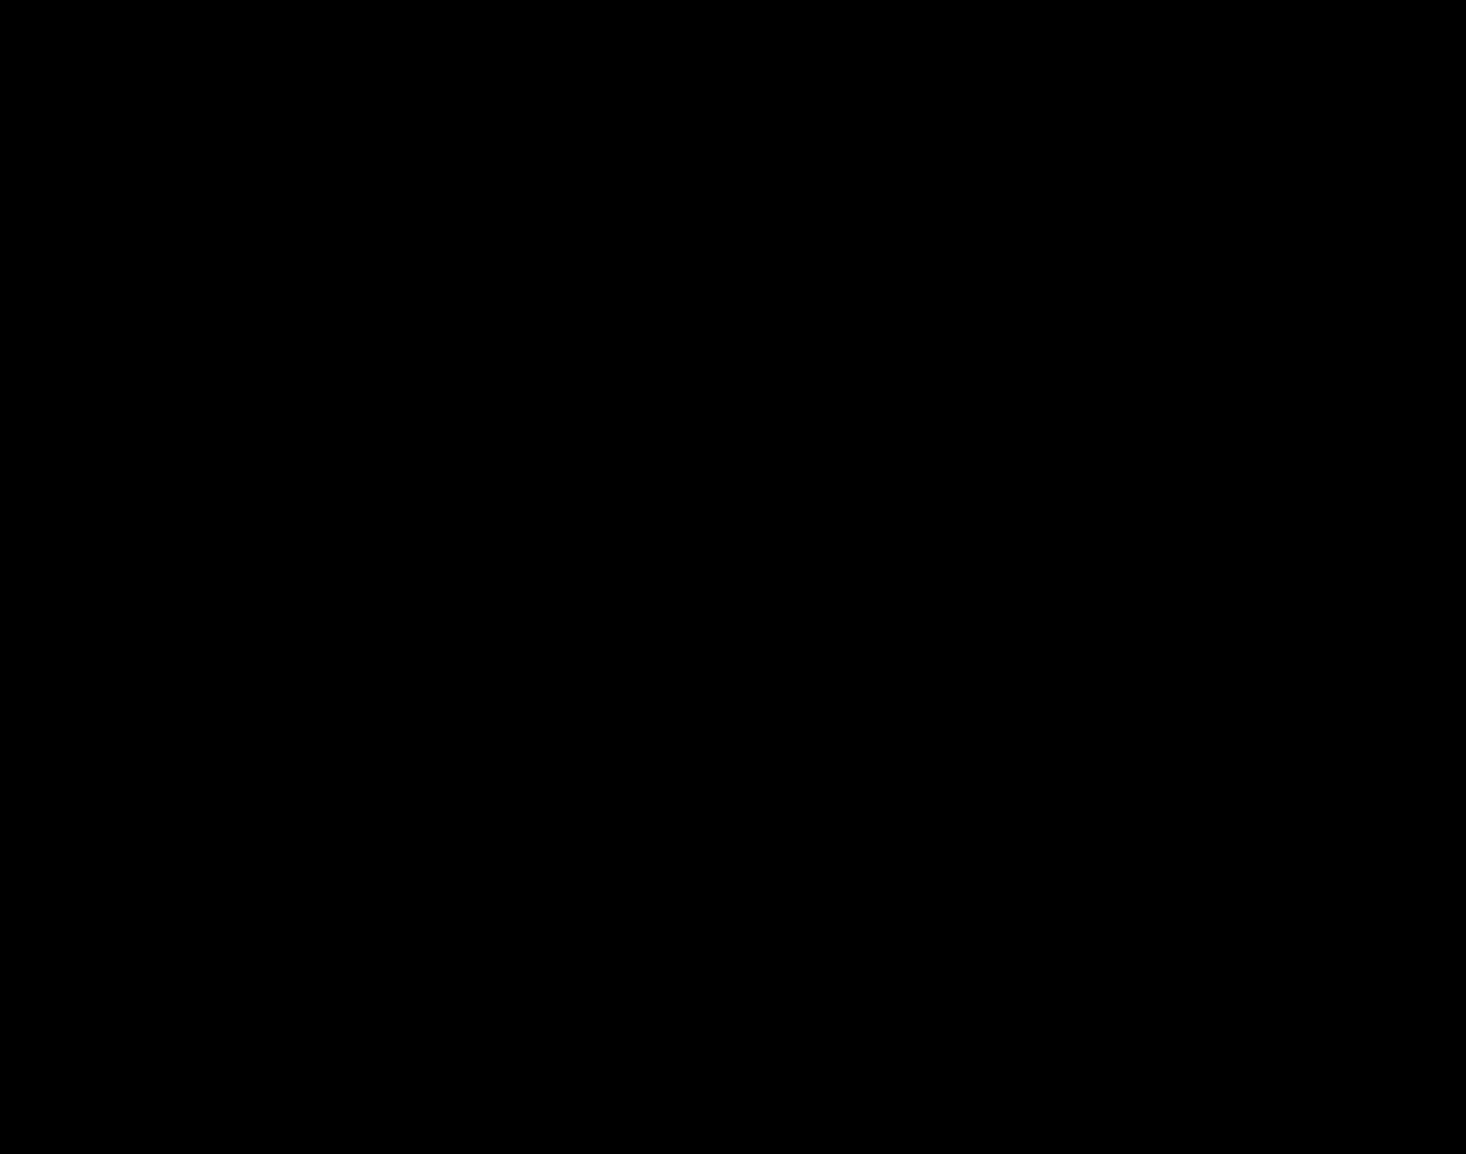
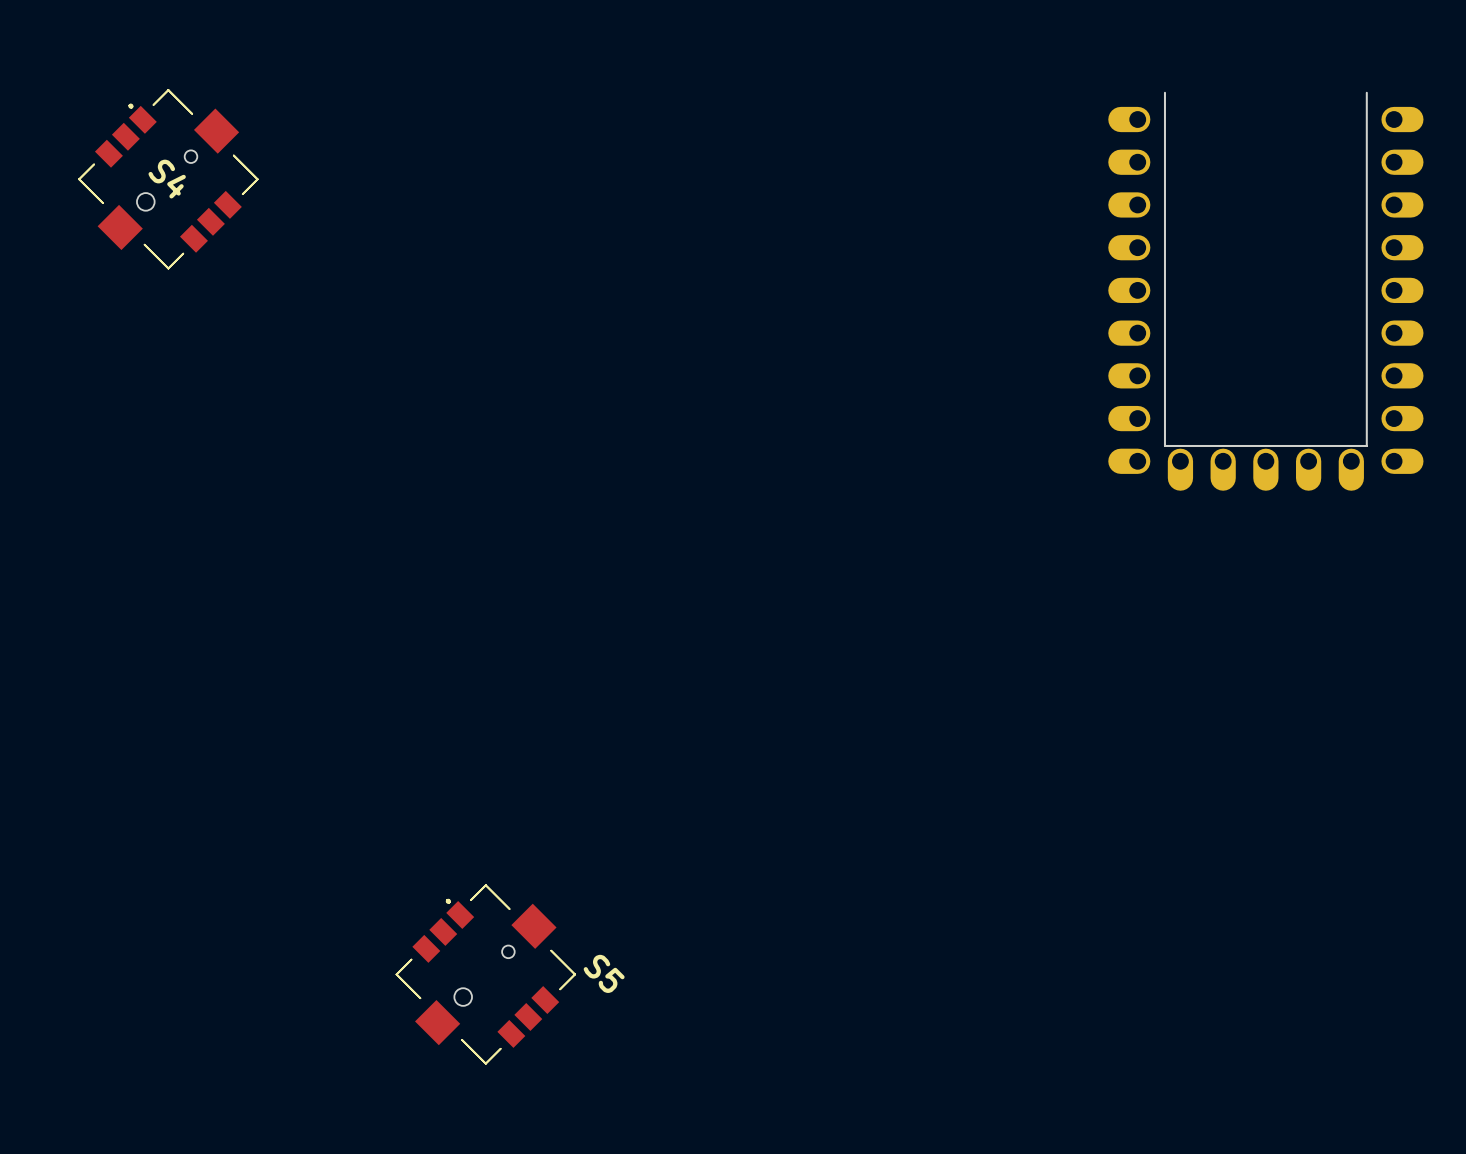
S4: none -> (168, 179)
part: none -> (1265, 291)
S5: none -> (485, 974)

